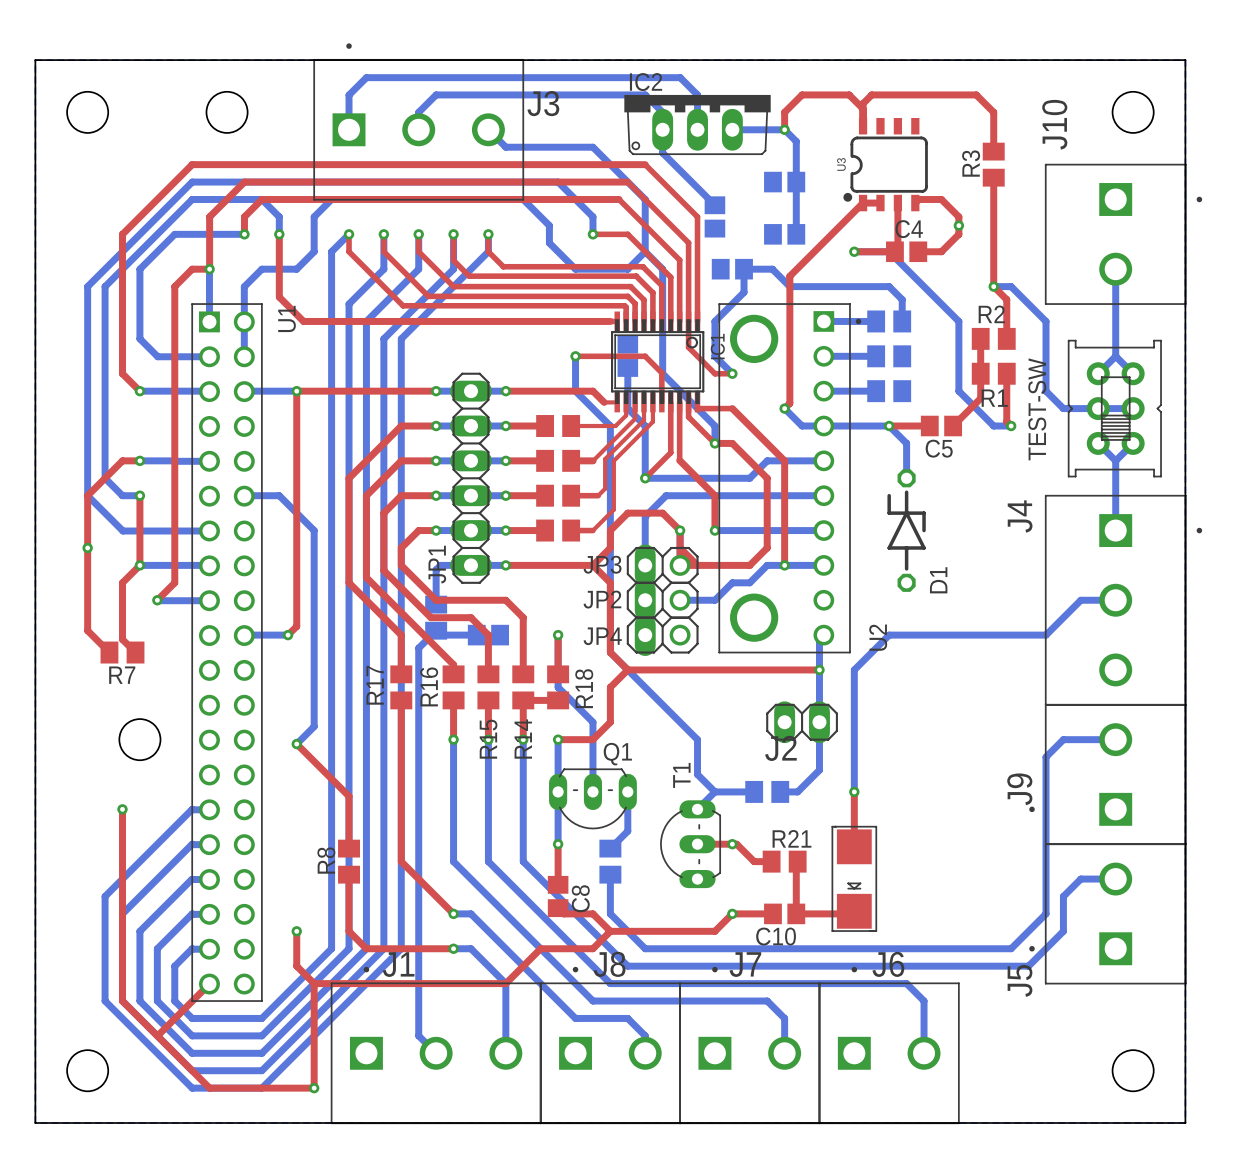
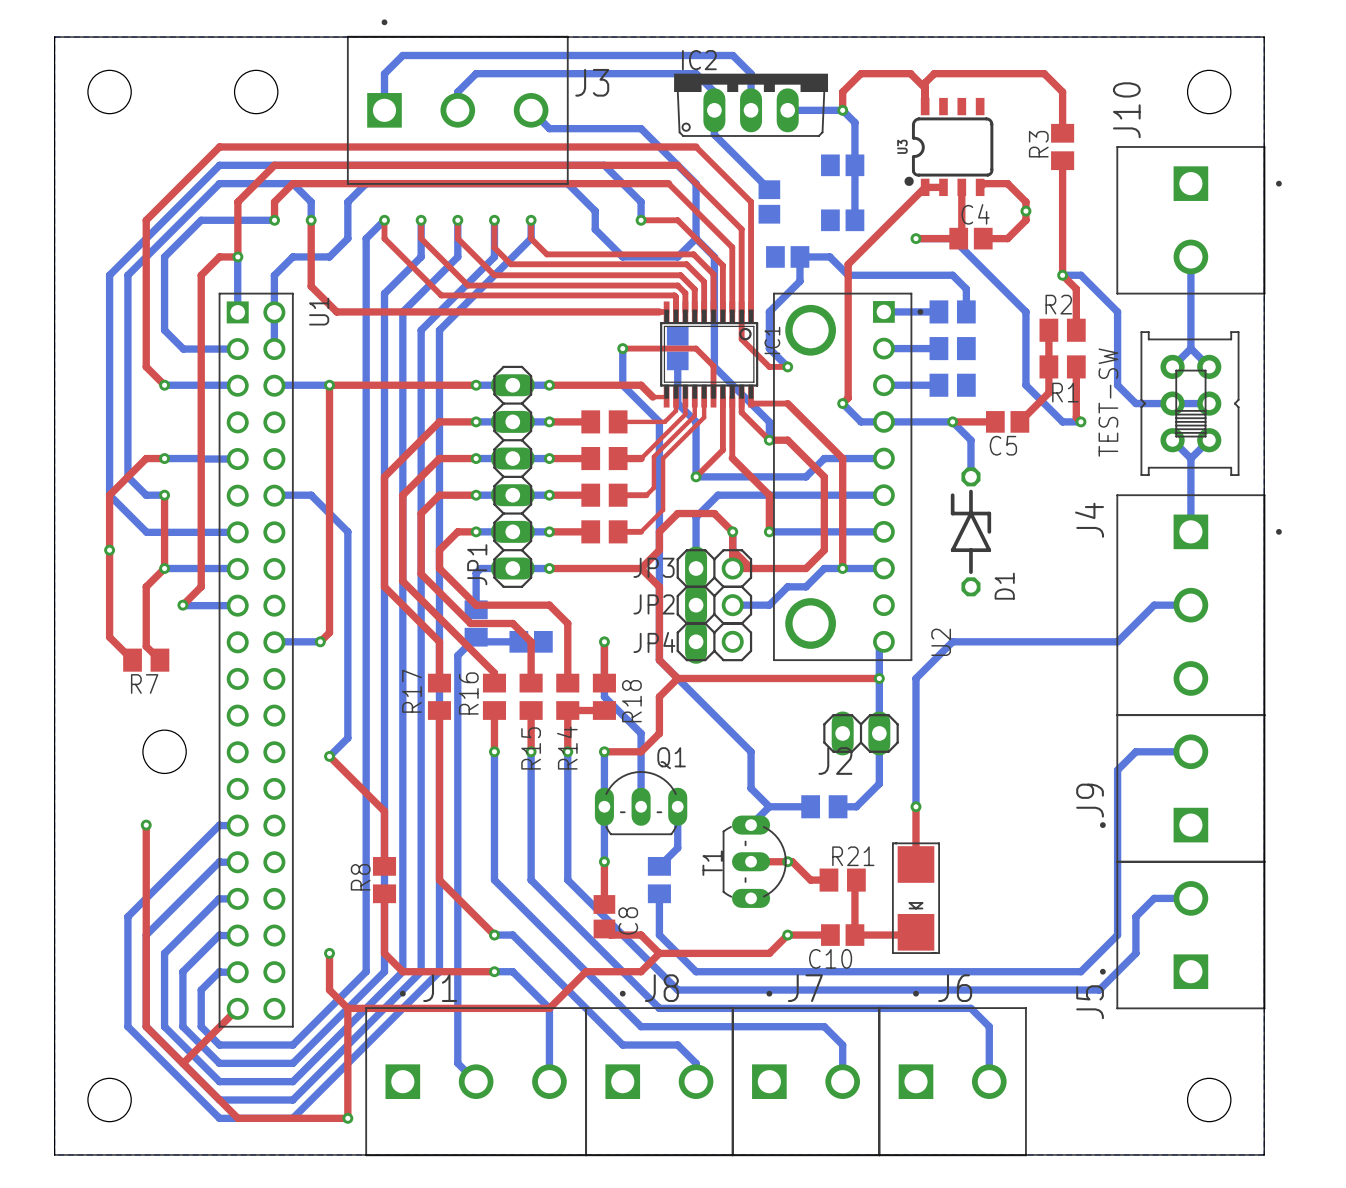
Q1 name position: Q1 (617, 754) -> Q1 (671, 758)
Q1 footprint: [549, 768, 637, 830] -> [594, 771, 688, 836]
T1 name position: T1 (681, 775) -> T1 (712, 863)
T1 footprint: [660, 800, 722, 889] -> [722, 815, 787, 908]

